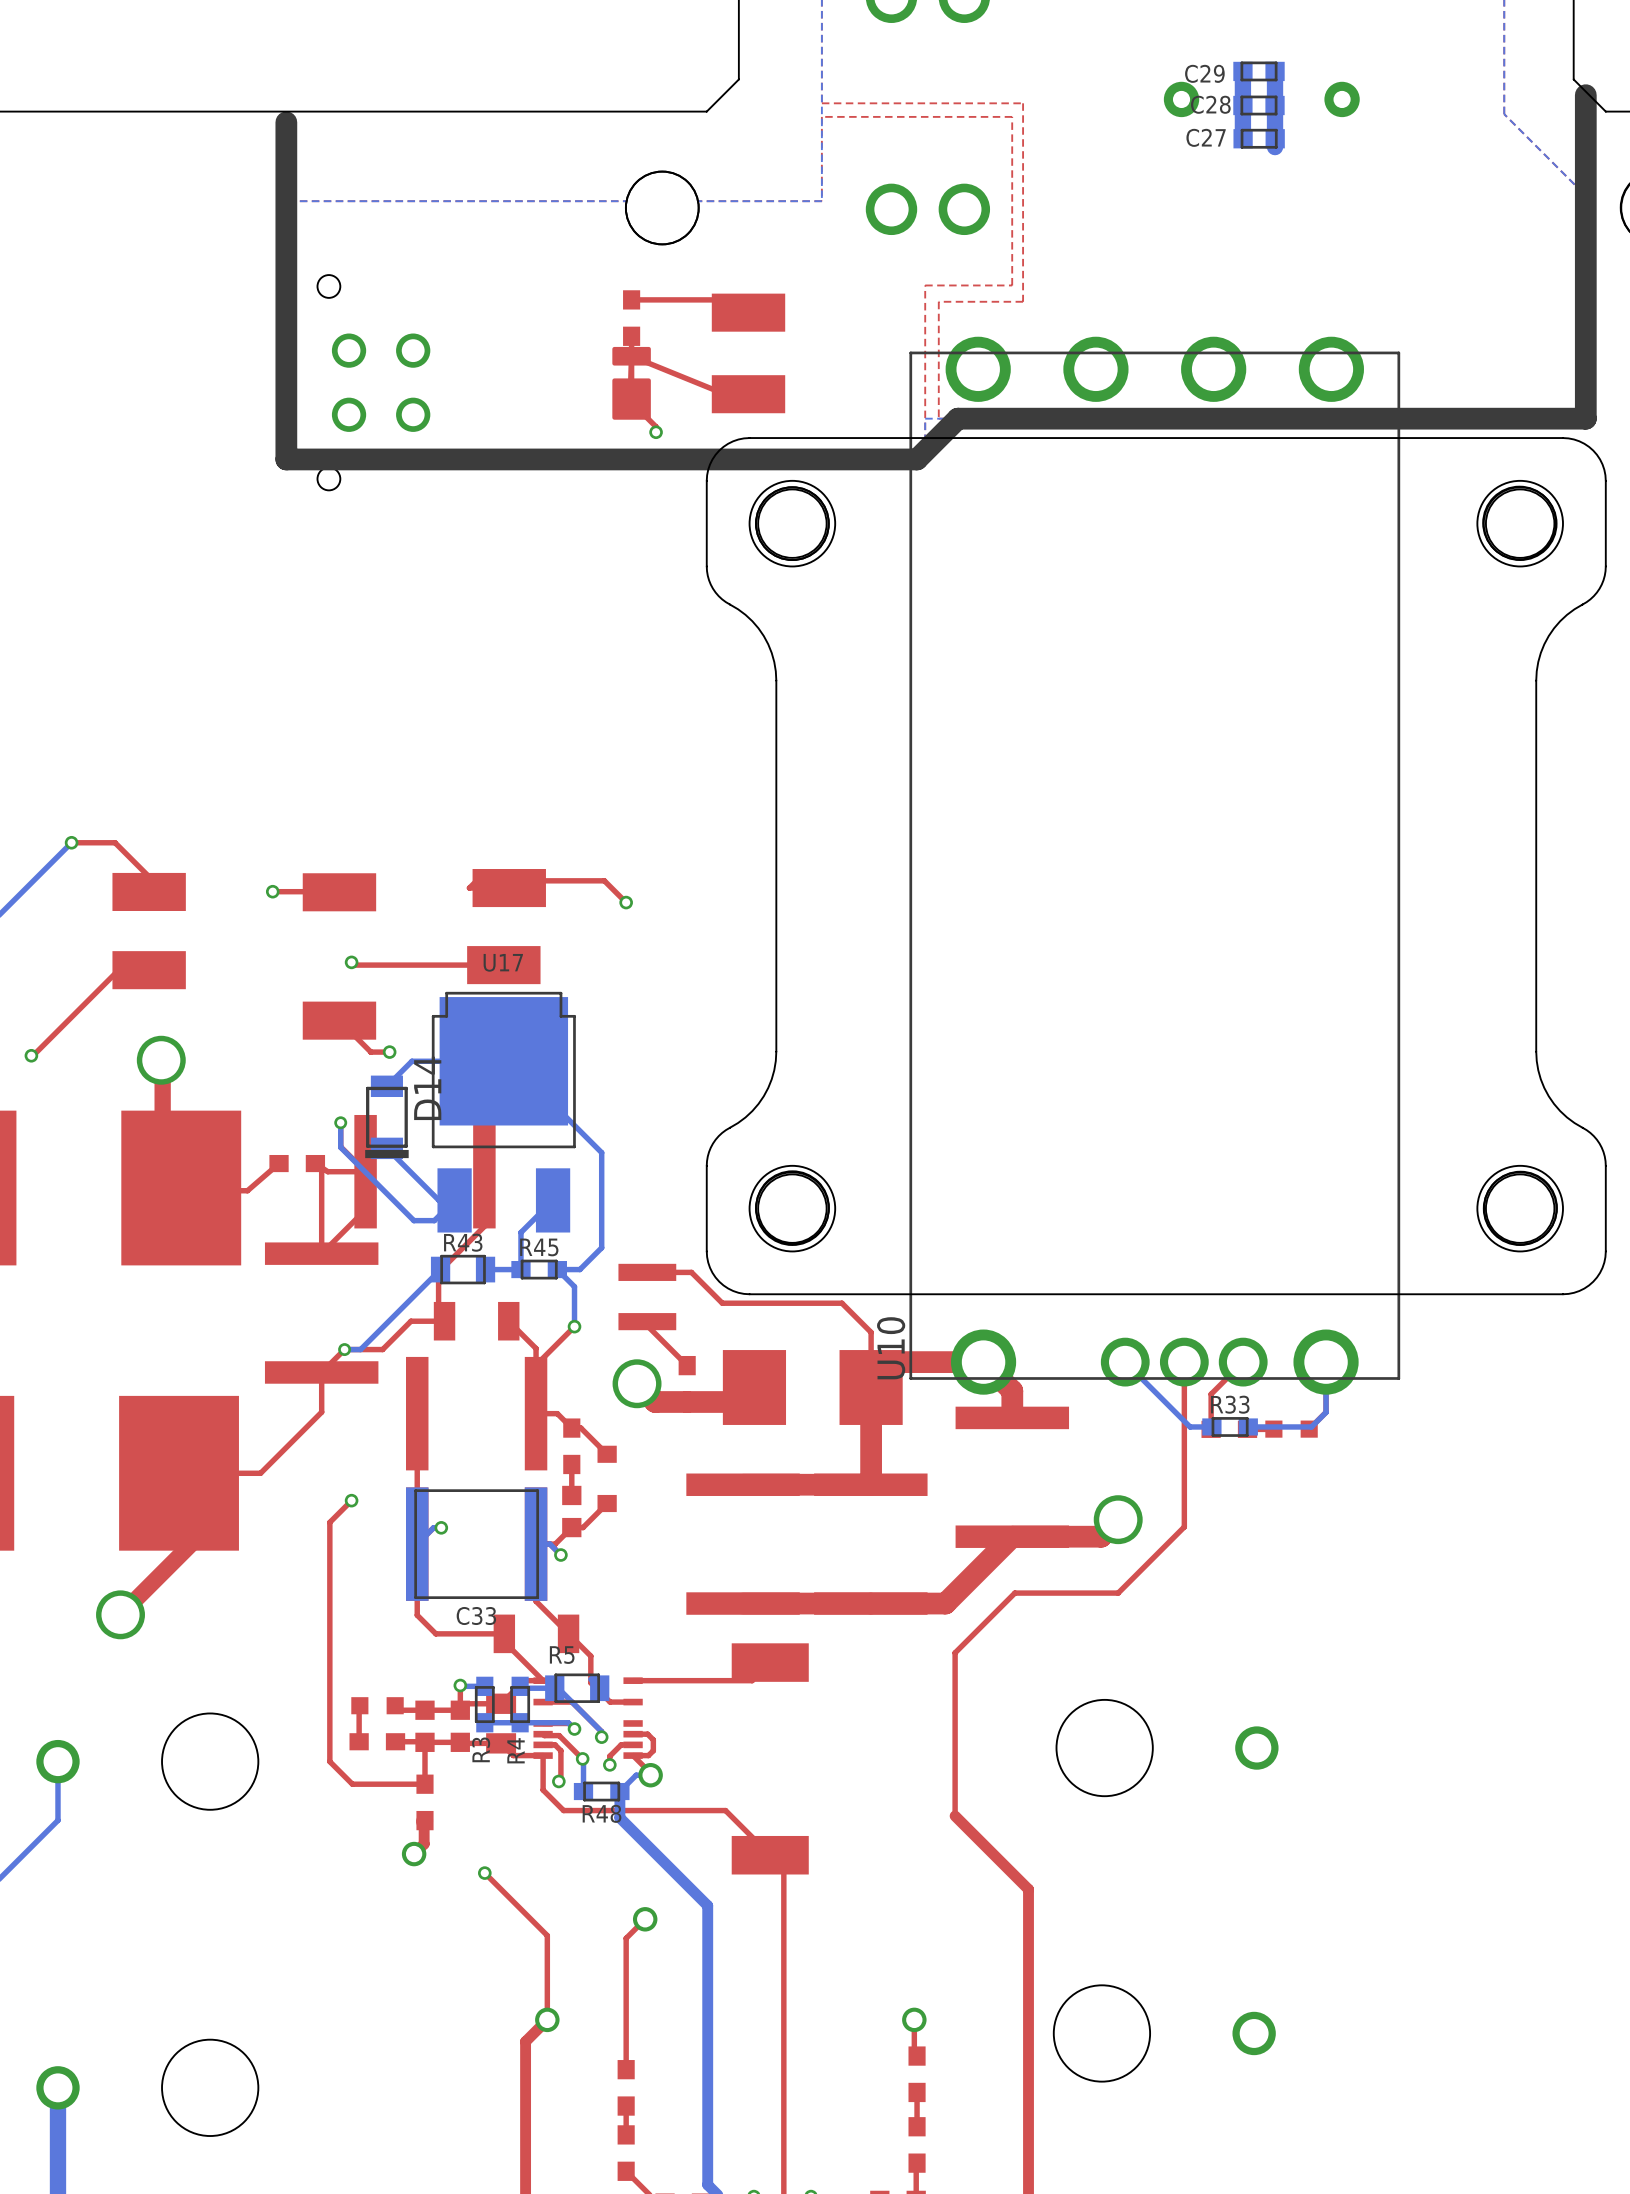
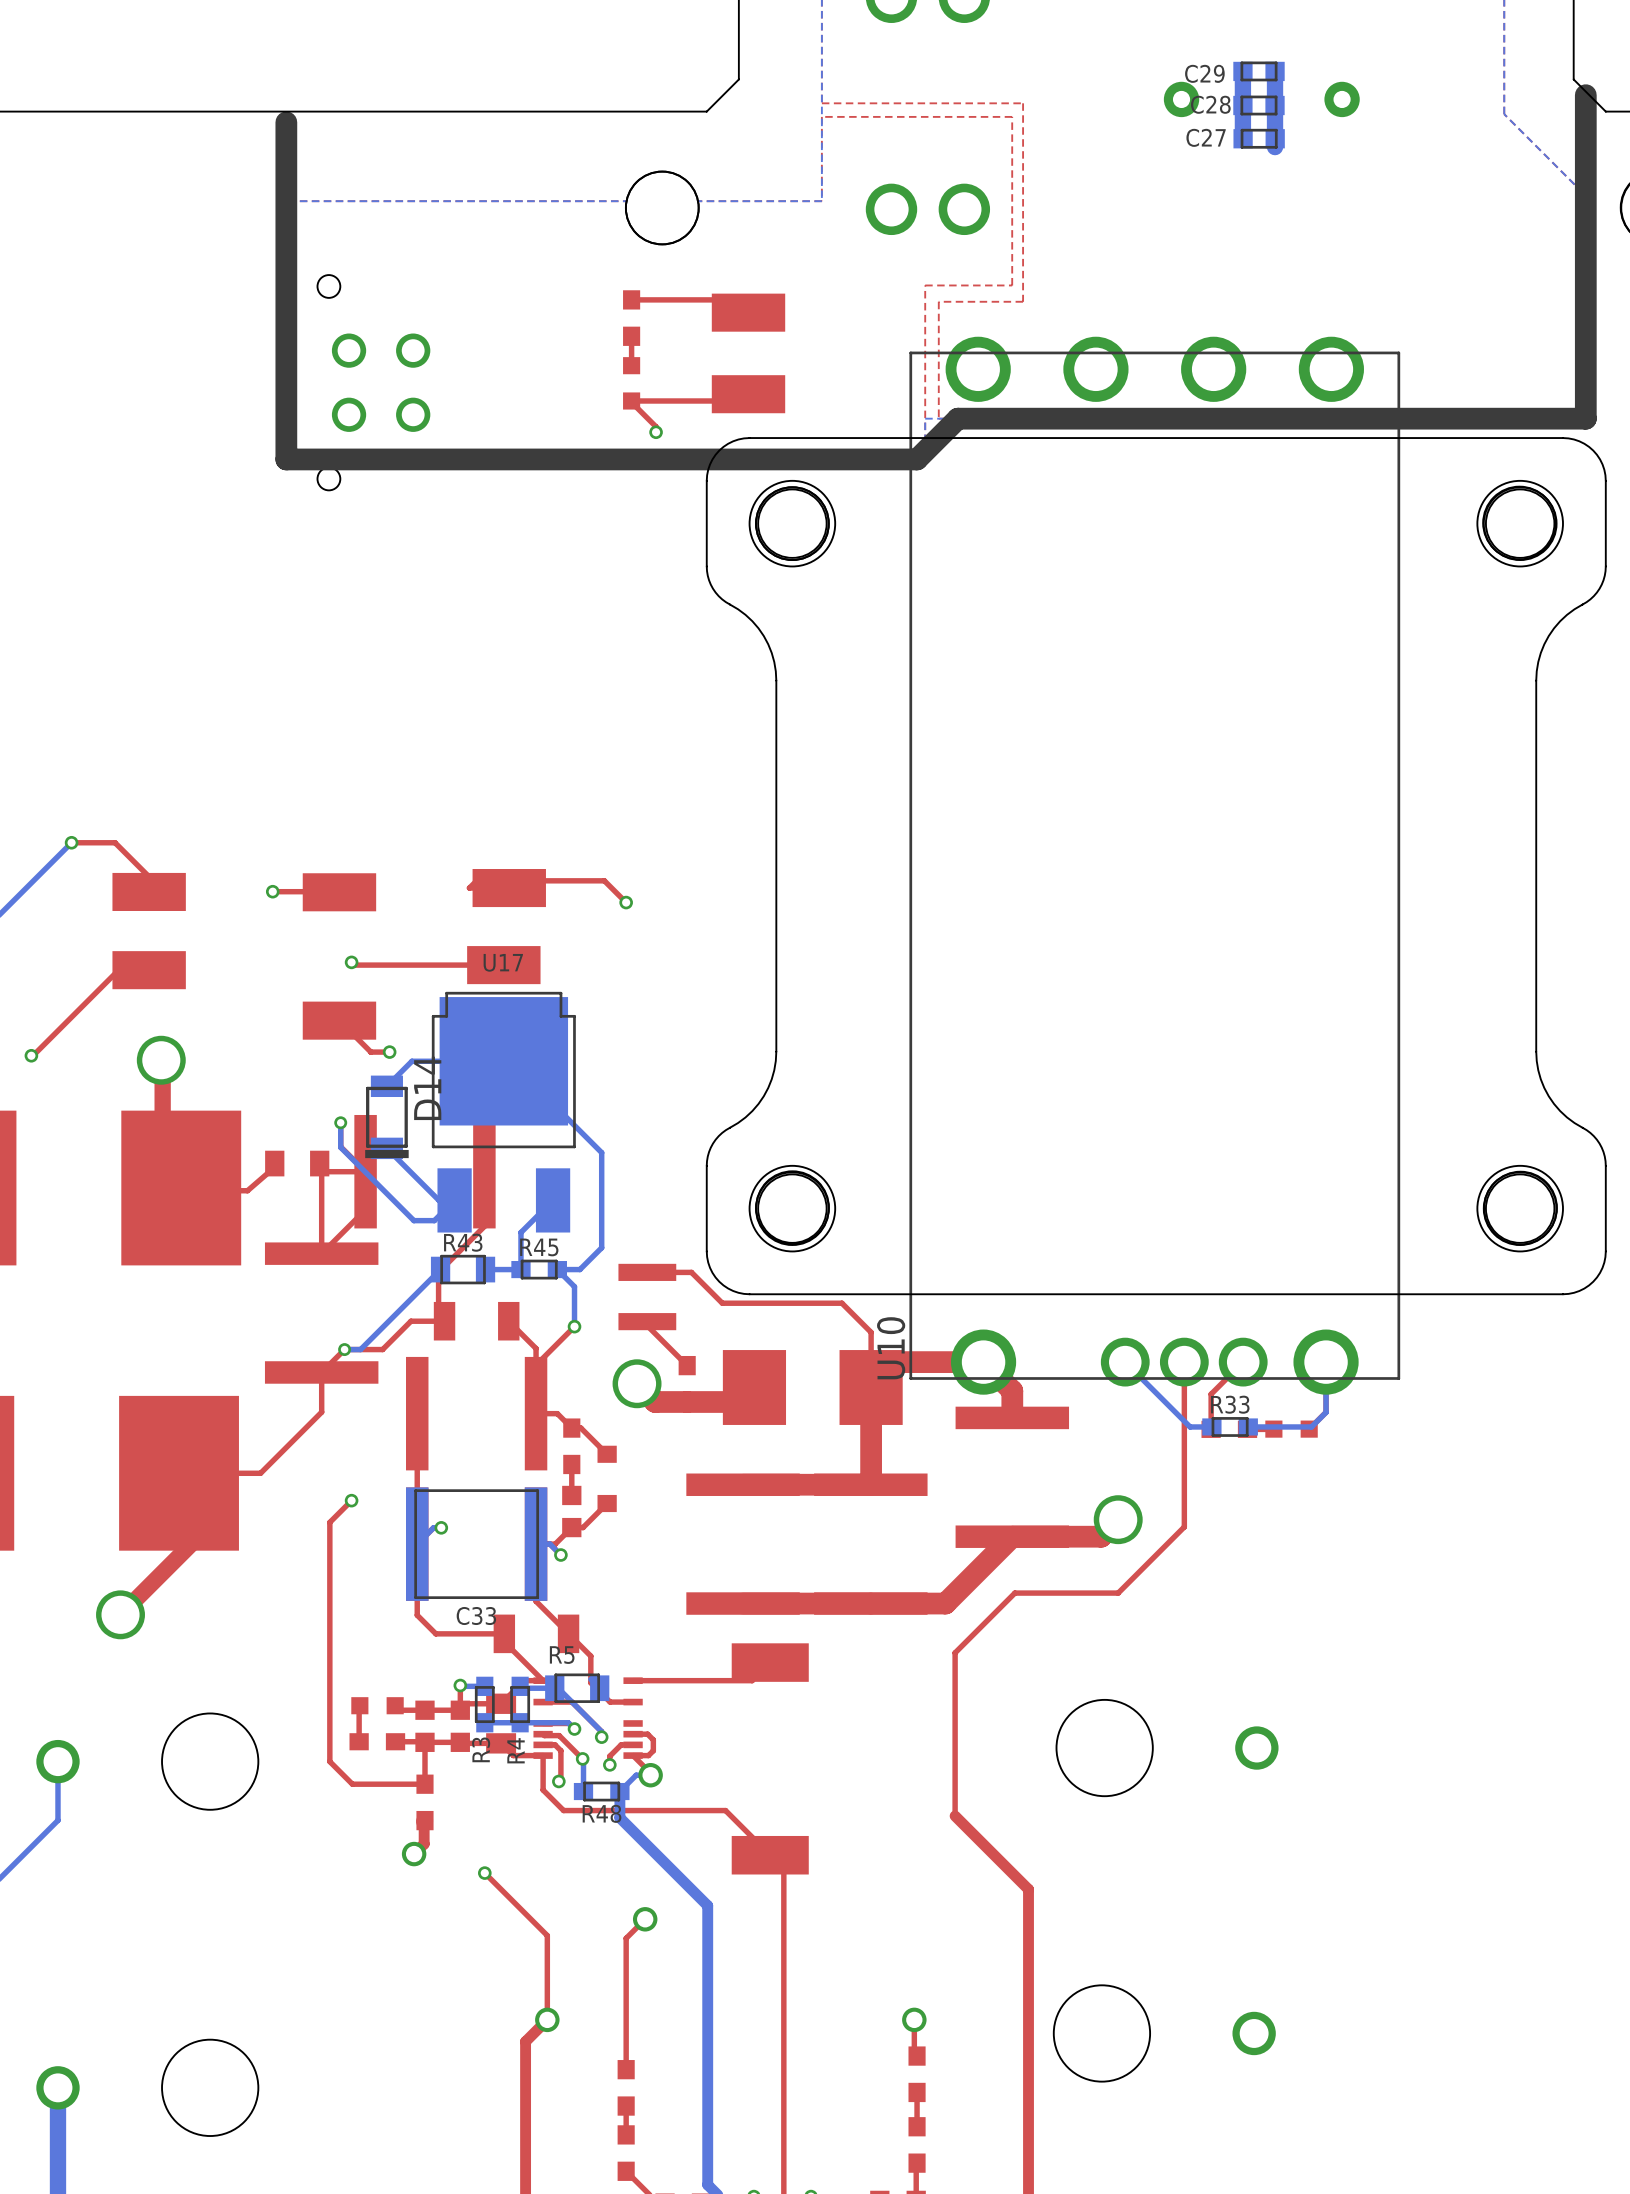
part footprint: [612, 346, 651, 420] -> [623, 357, 641, 410]
top track: (741, 400) (631, 356) (630, 400) -> (741, 400) (630, 400)
part footprint: [269, 1154, 326, 1173] -> [265, 1150, 330, 1177]

